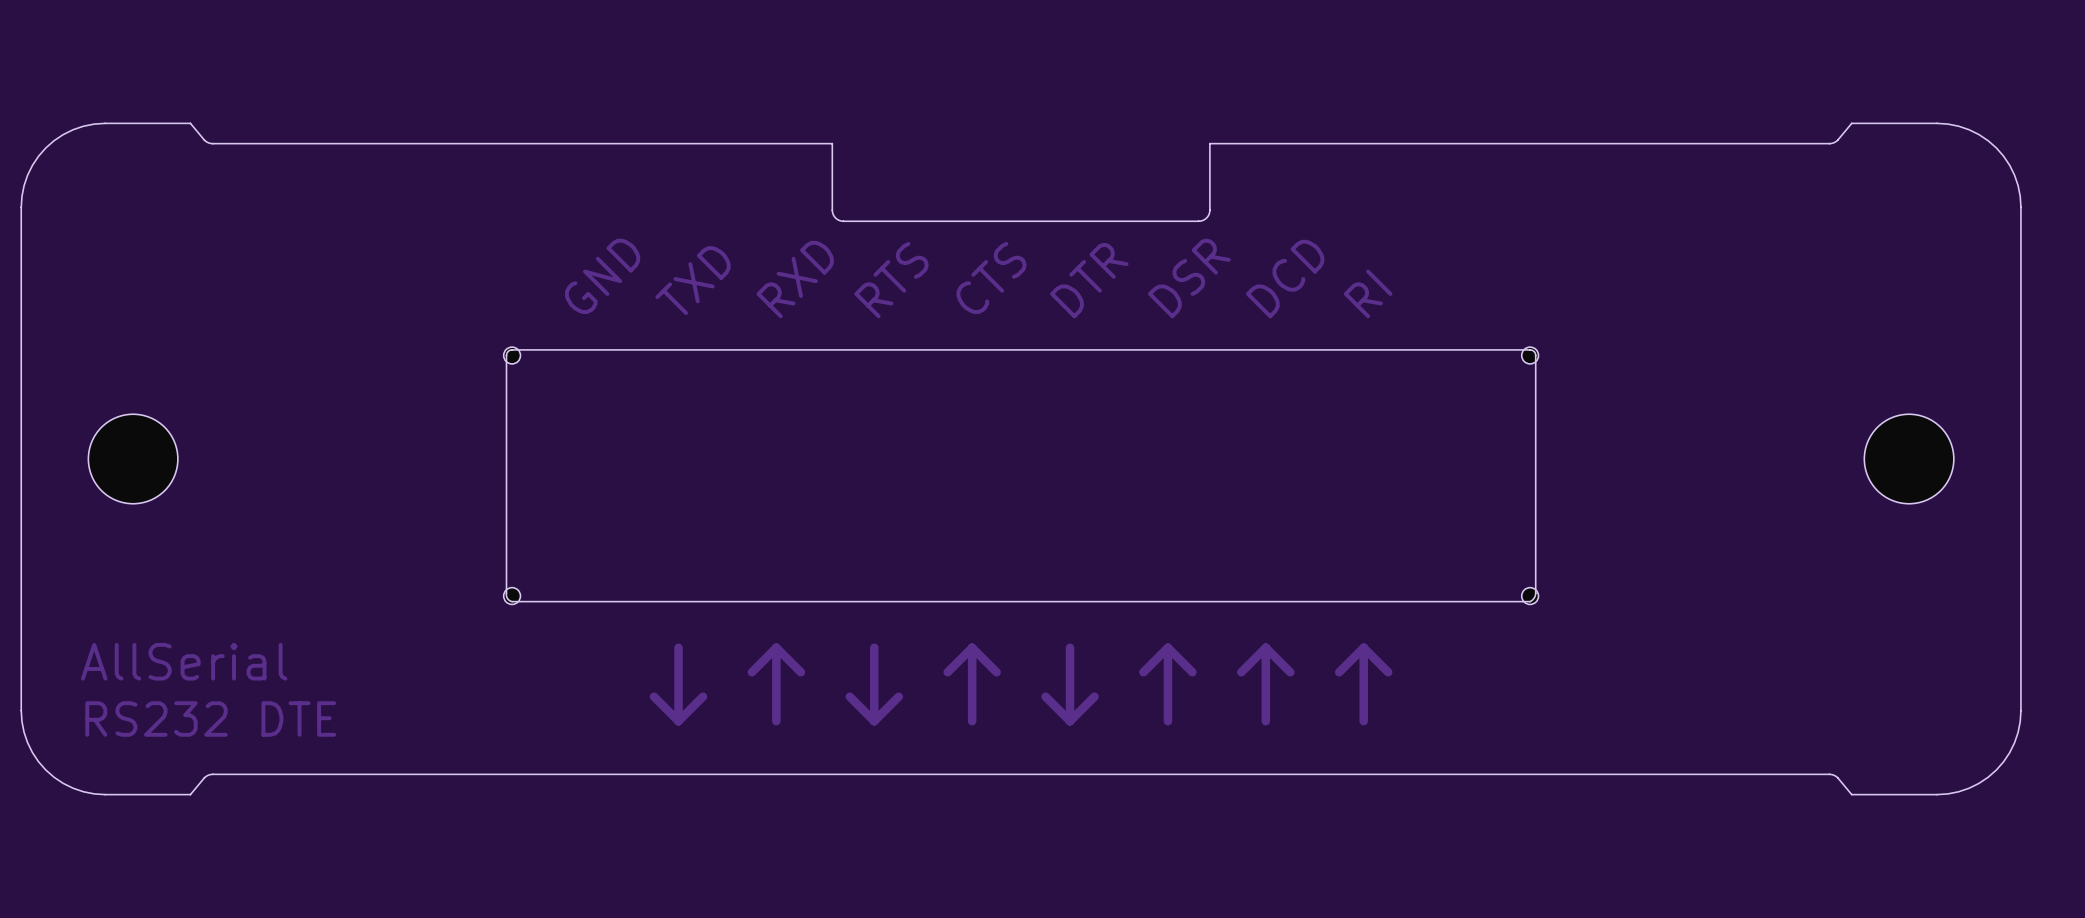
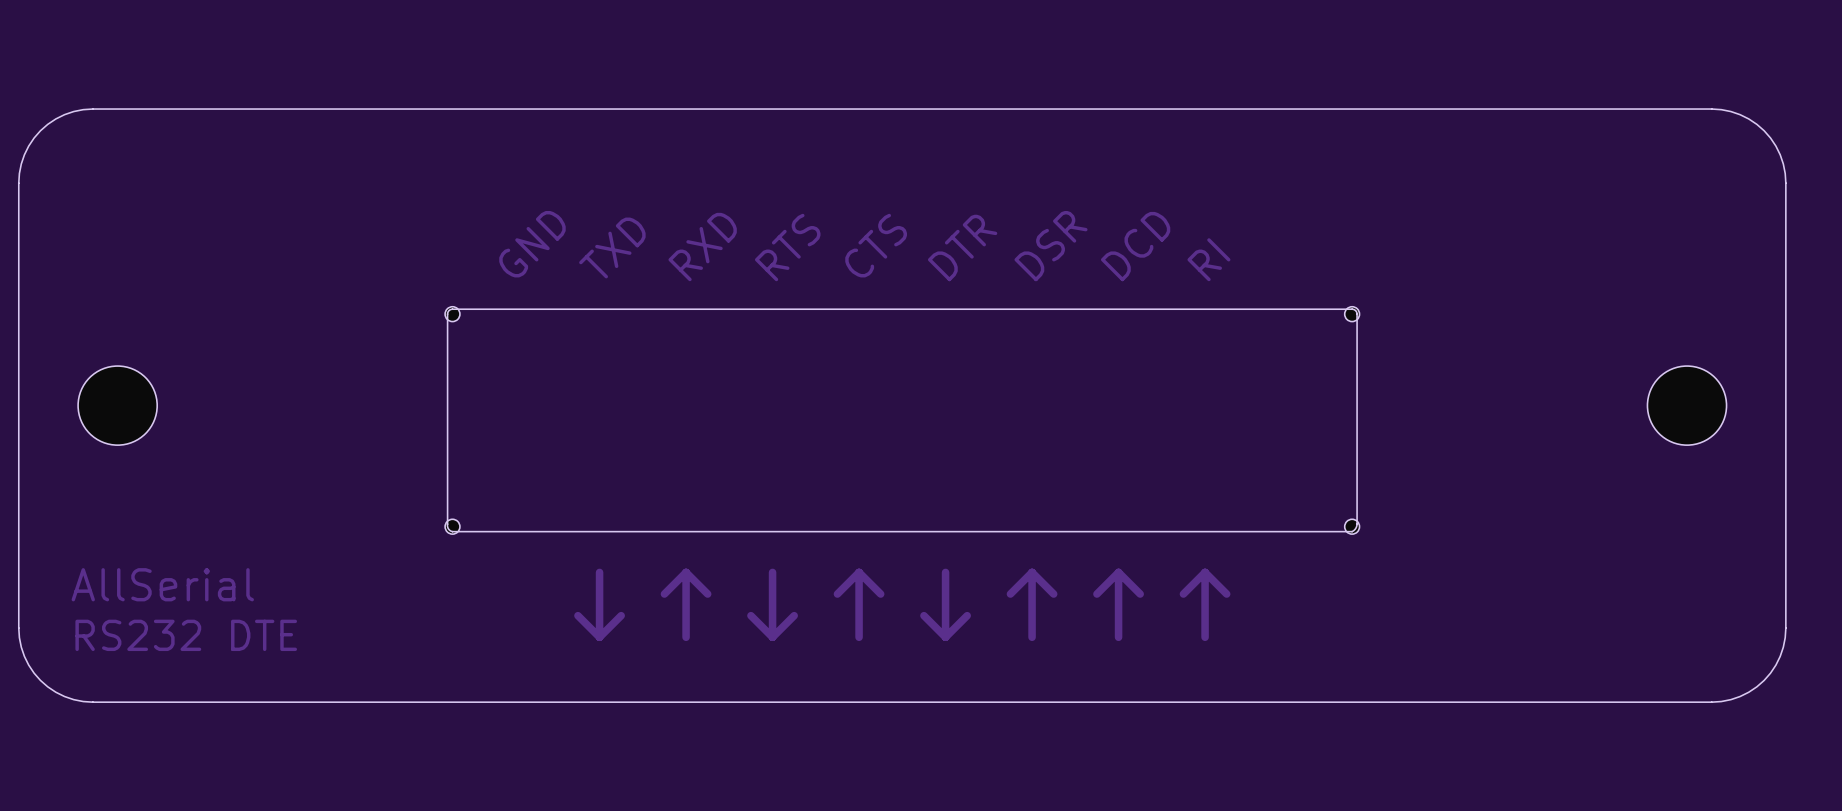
part footprint: [20, 122, 2022, 796] -> [18, 108, 1787, 703]

